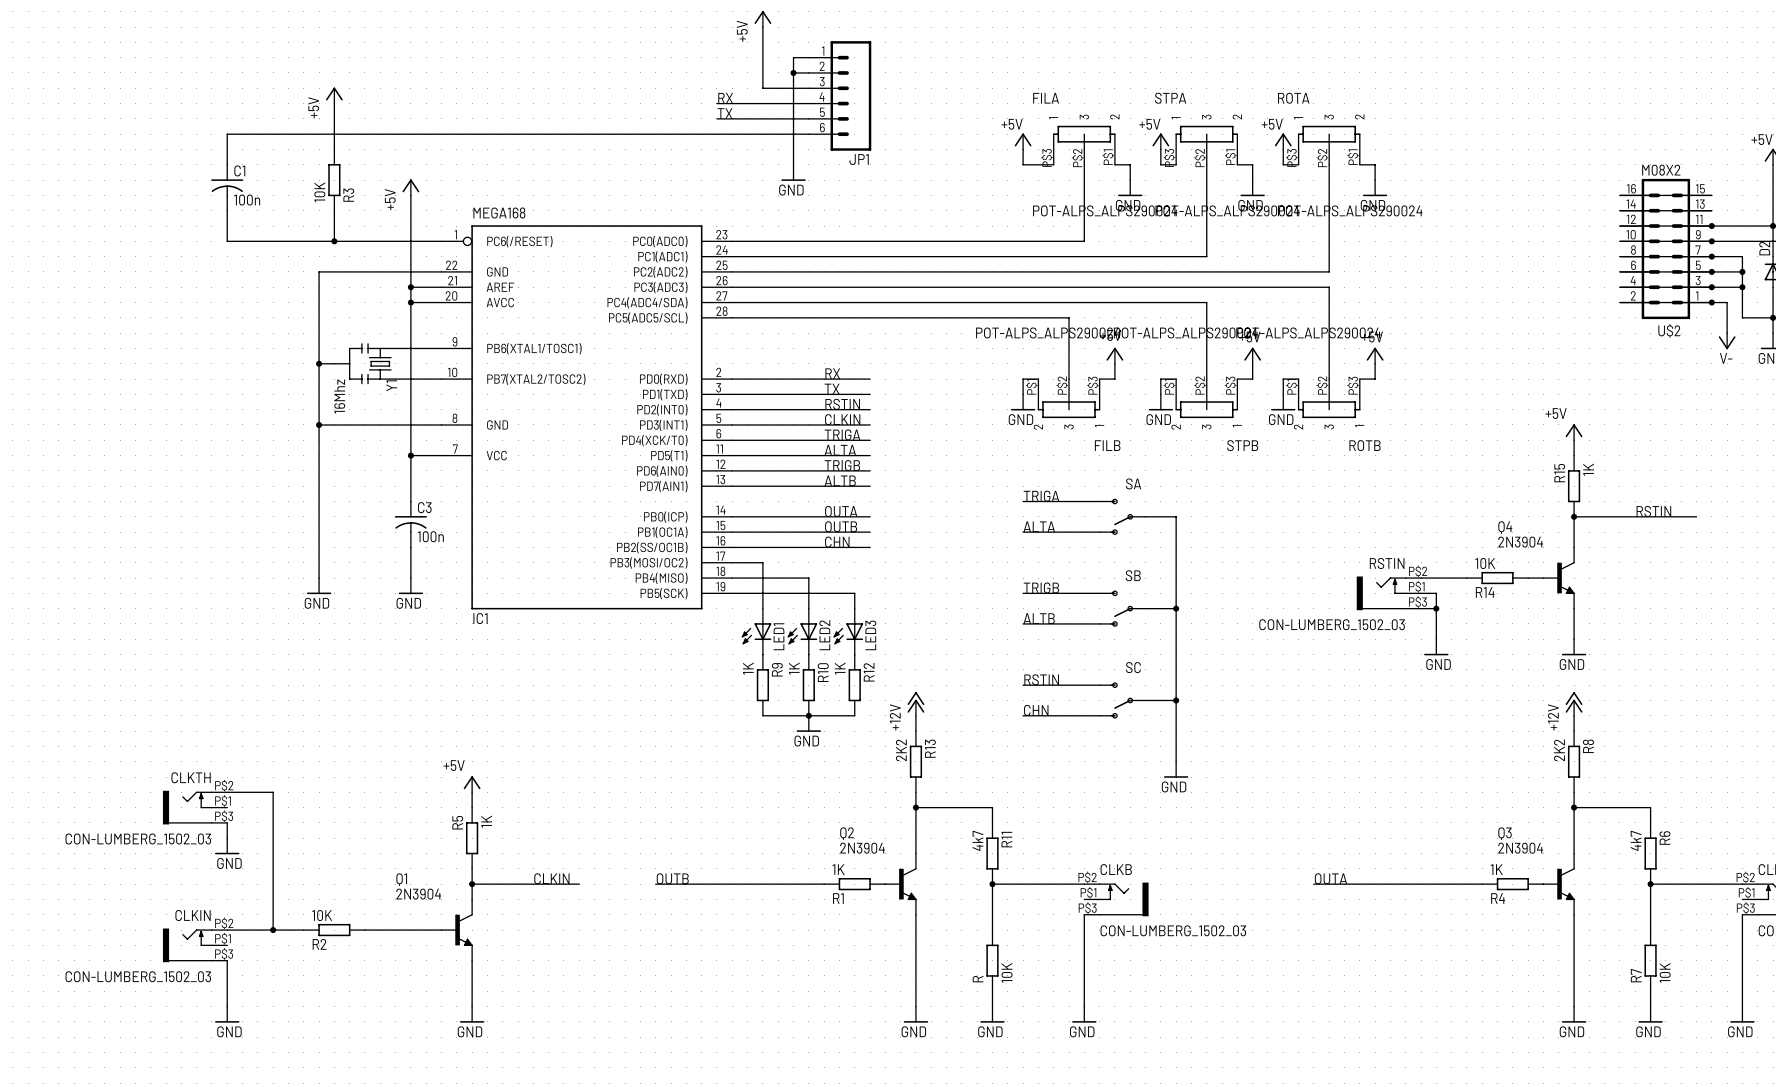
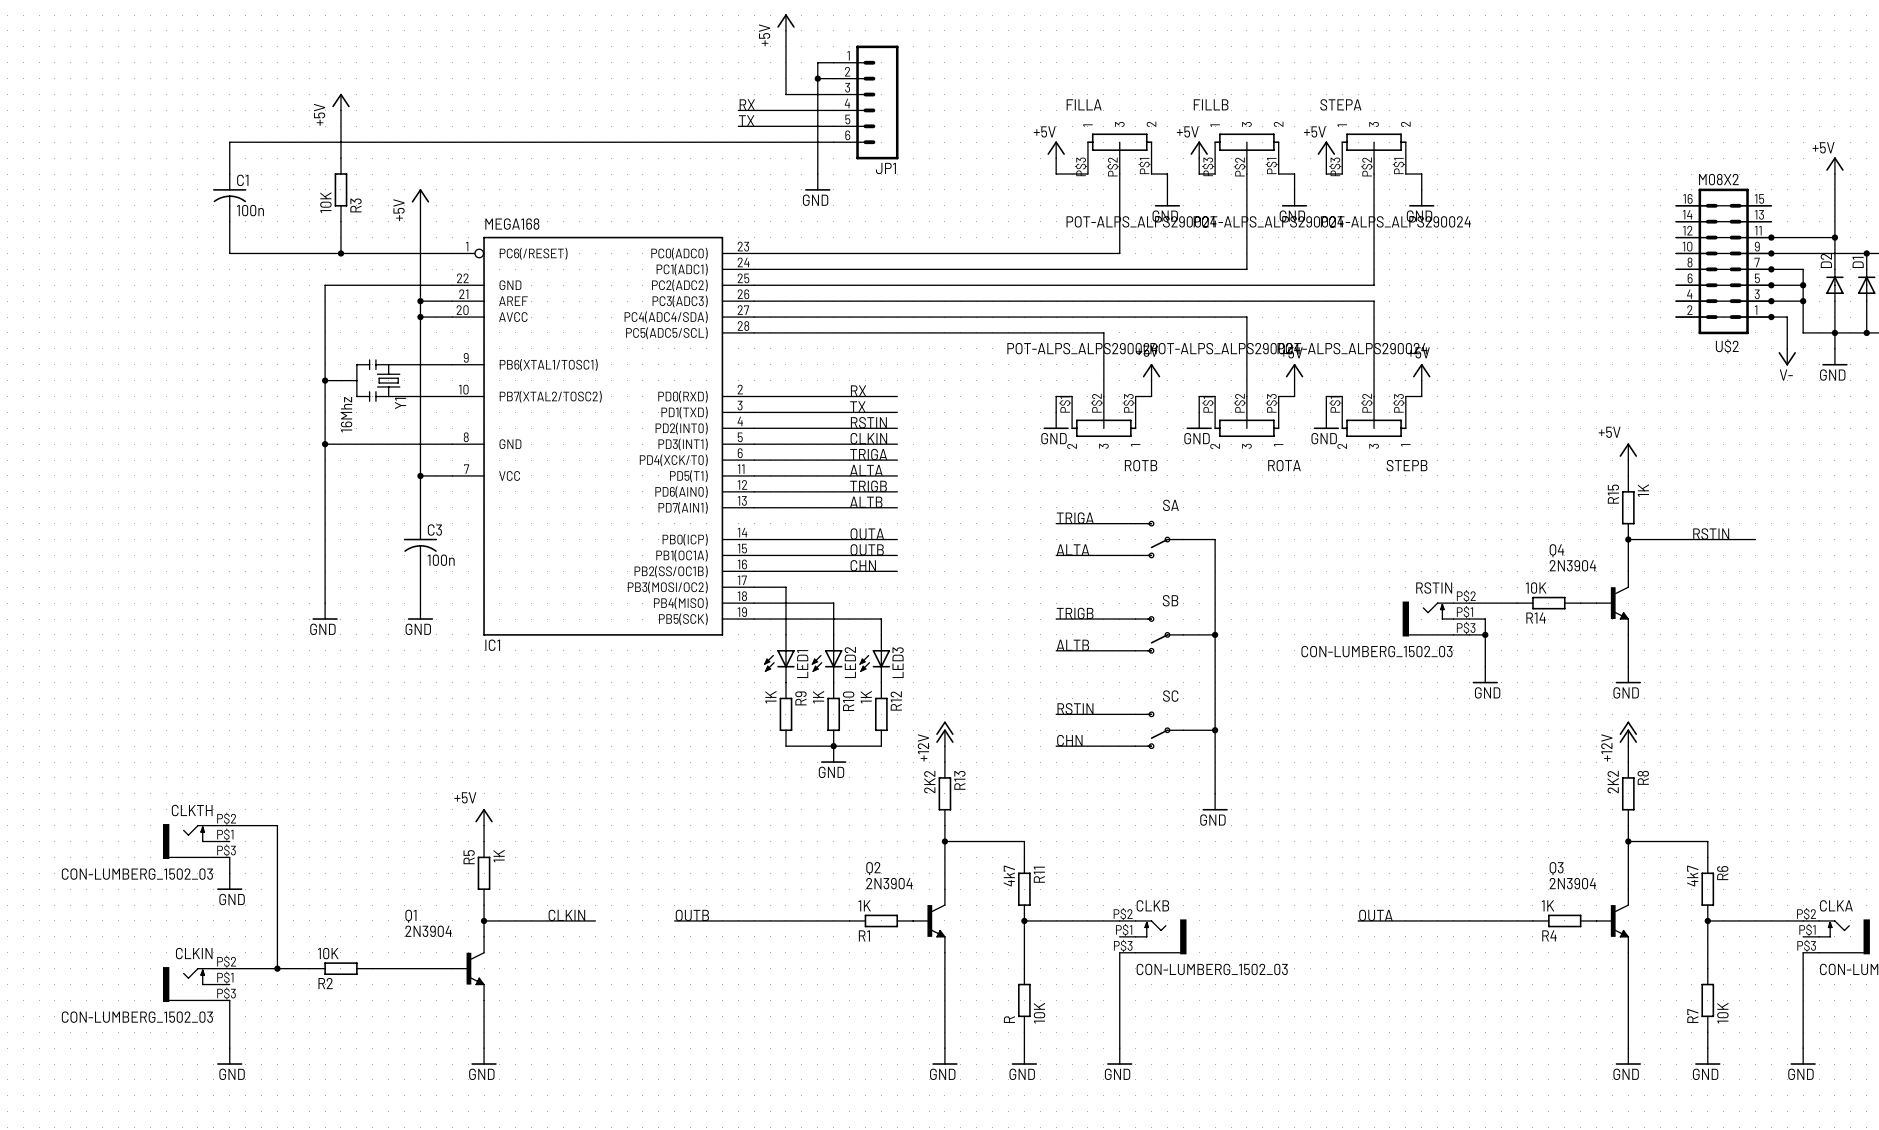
FILA name: FILA (1046, 98) -> FILLA (1084, 104)
STPA name: STPA (1170, 98) -> FILLB (1211, 104)
ROTA name: ROTA (1293, 98) -> STEPA (1340, 104)
FILB name: FILB (1107, 445) -> ROTB (1141, 465)
STPB name: STPB (1242, 445) -> ROTA (1284, 465)
ROTB name: ROTB (1365, 445) -> STEPB (1407, 465)

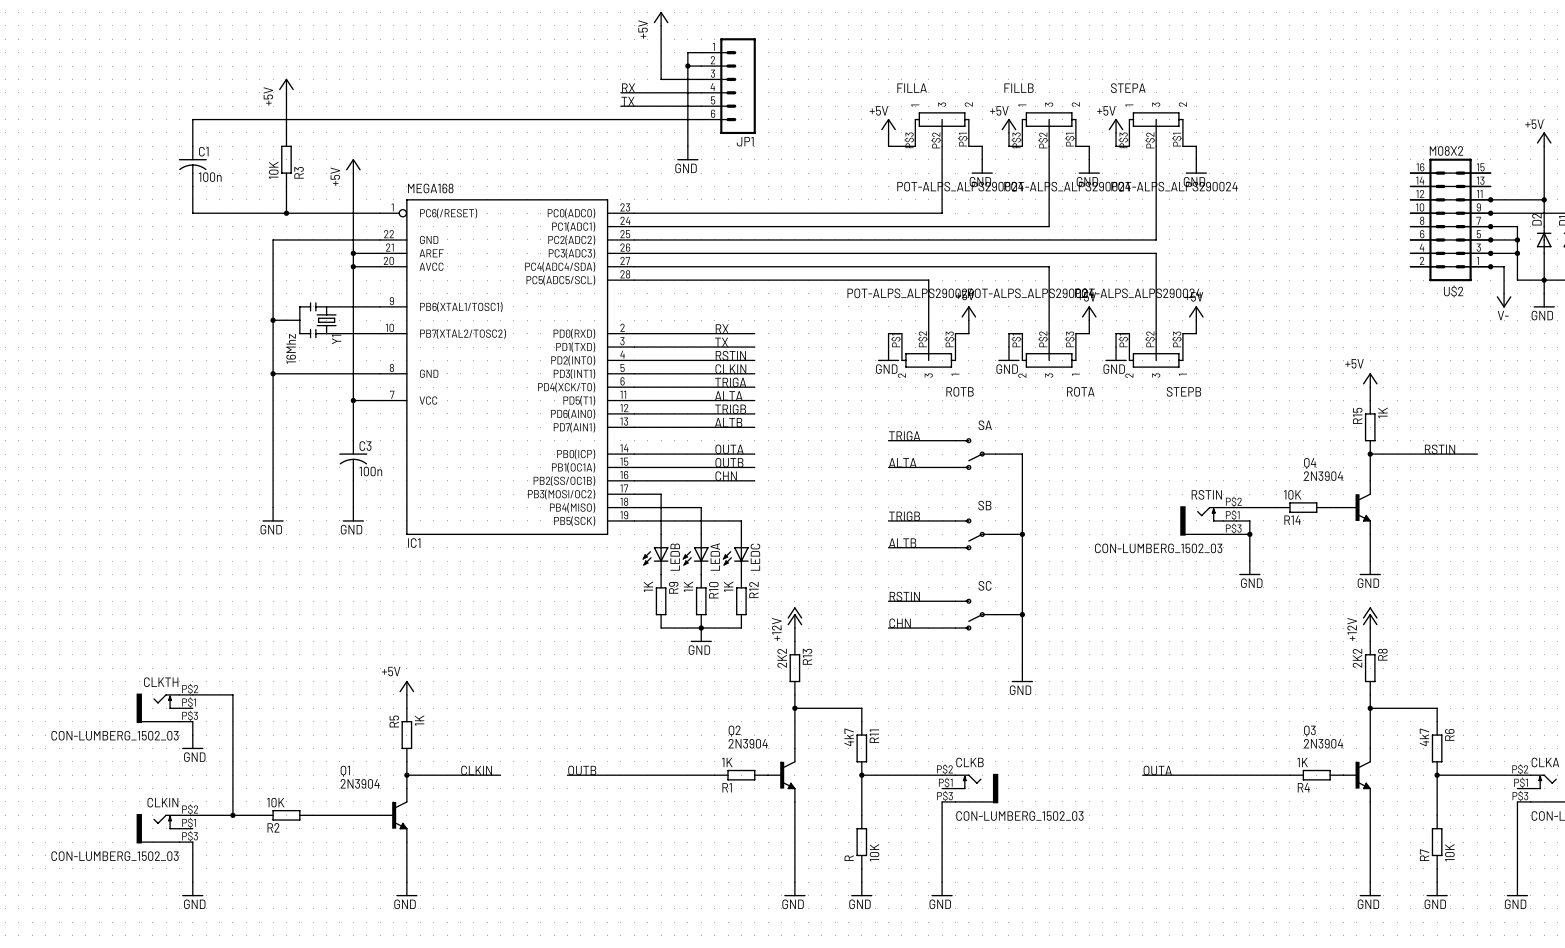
LED2 name: LED2 (850, 662) -> LEDA (715, 557)
LED3 name: LED3 (898, 662) -> LEDC (755, 557)
LED1 name: LED1 (802, 664) -> LEDB (675, 557)

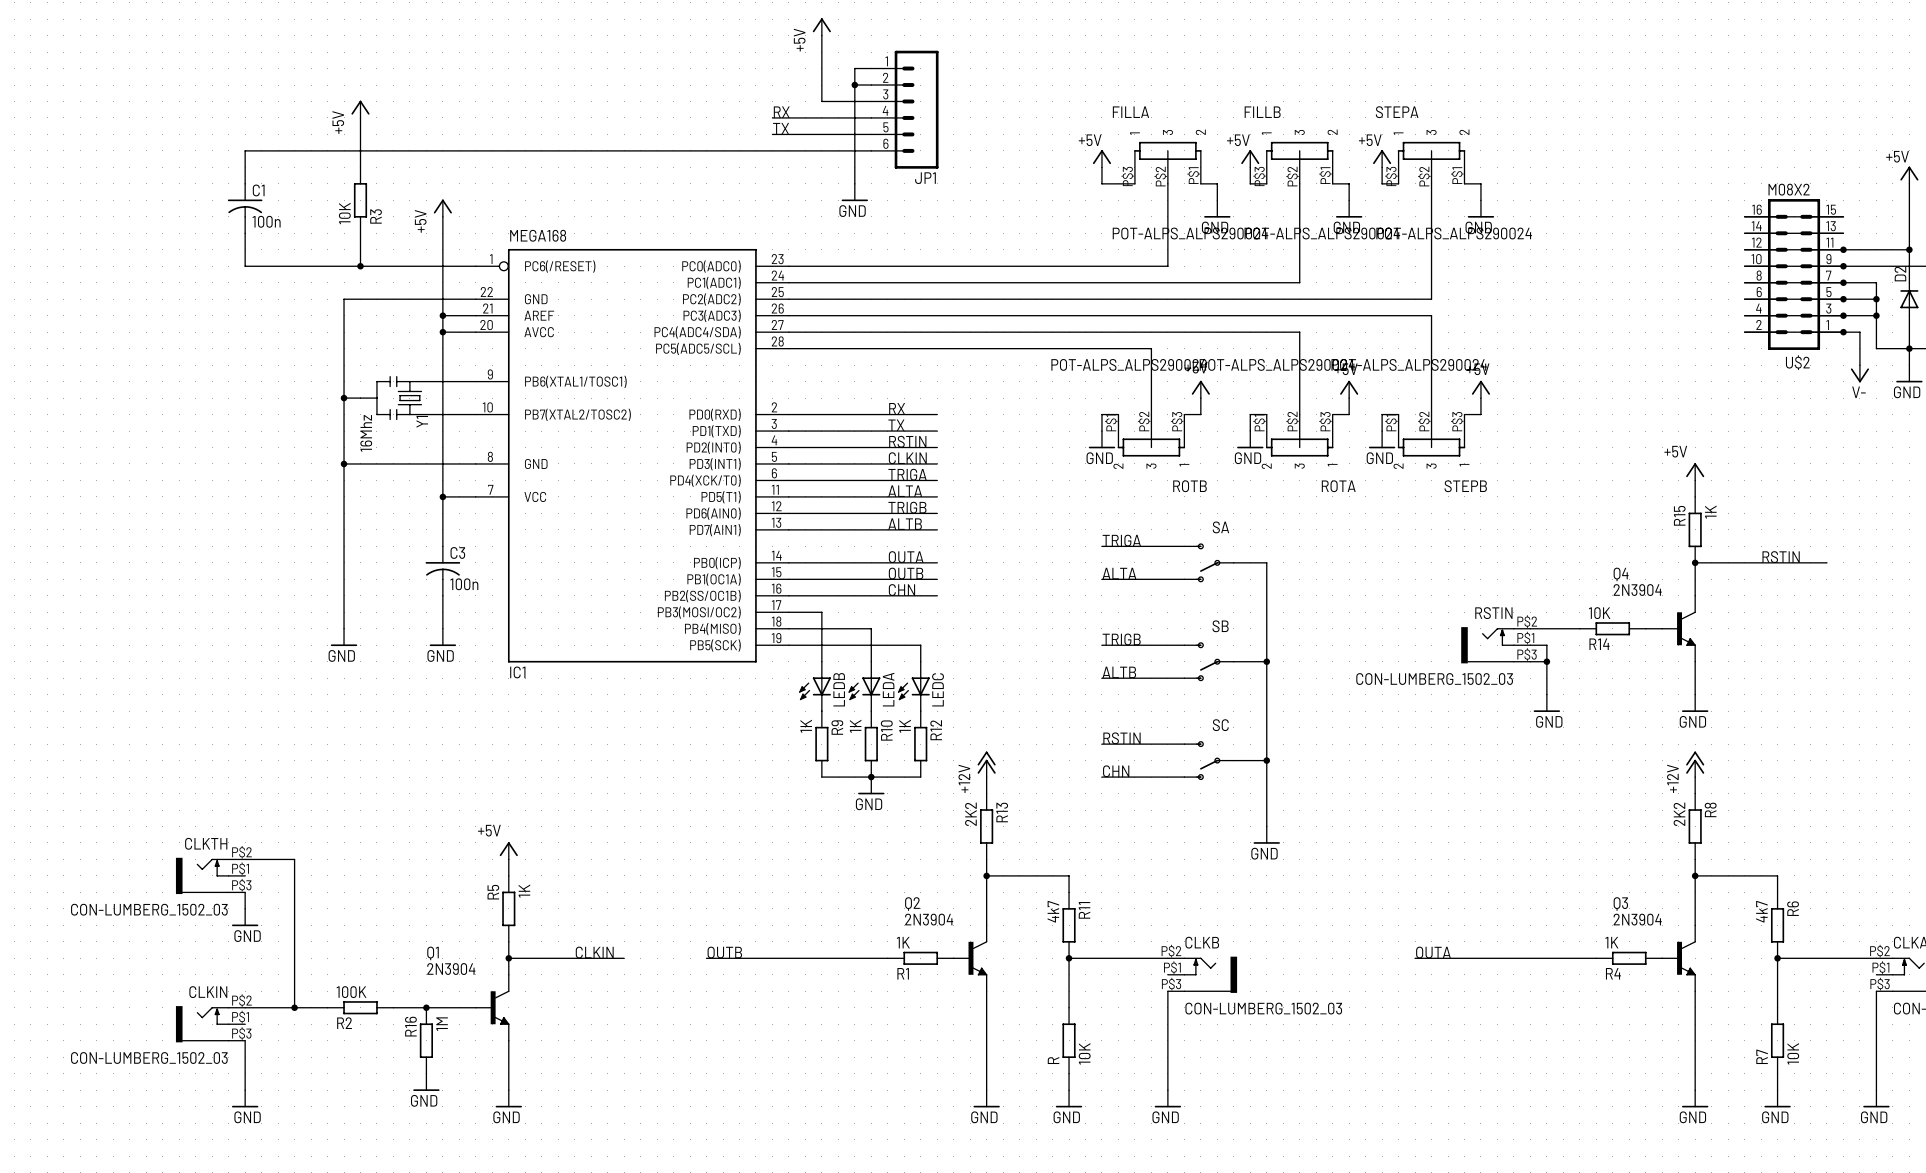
R2 value: 10K (275, 802) -> 100K (351, 992)
junction: none -> (426, 1007)
R16: none -> 1M (426, 1040)
power symbol: none -> GND (426, 1082)

